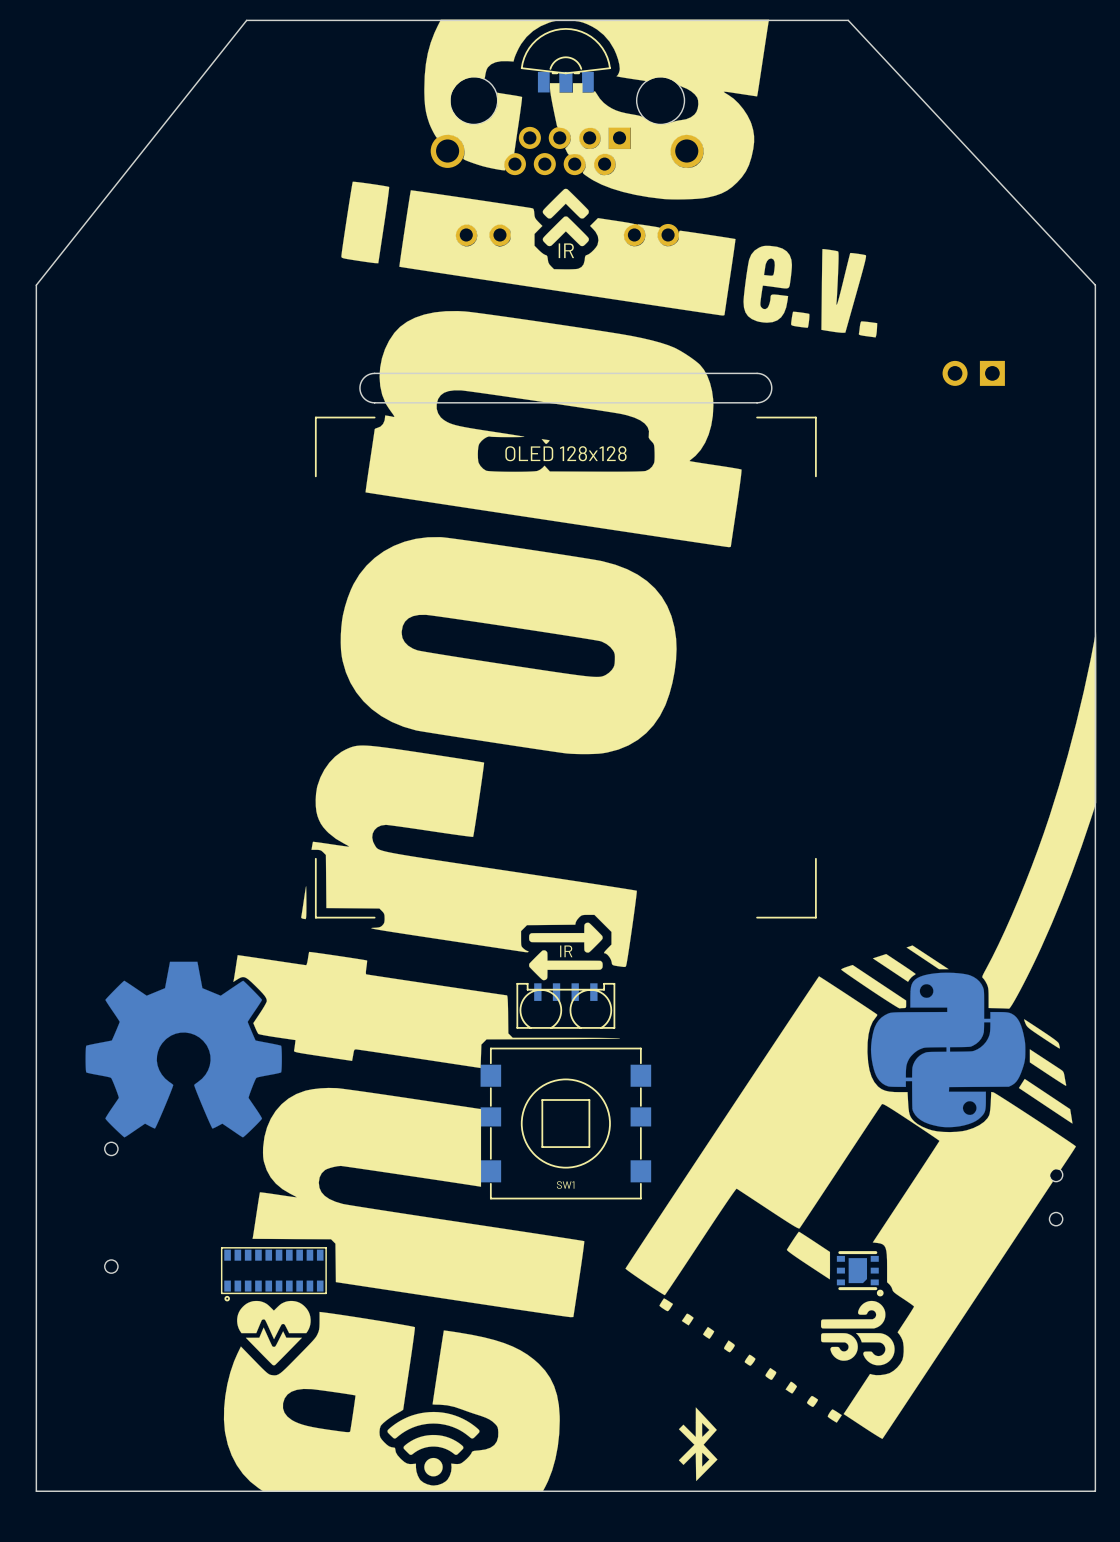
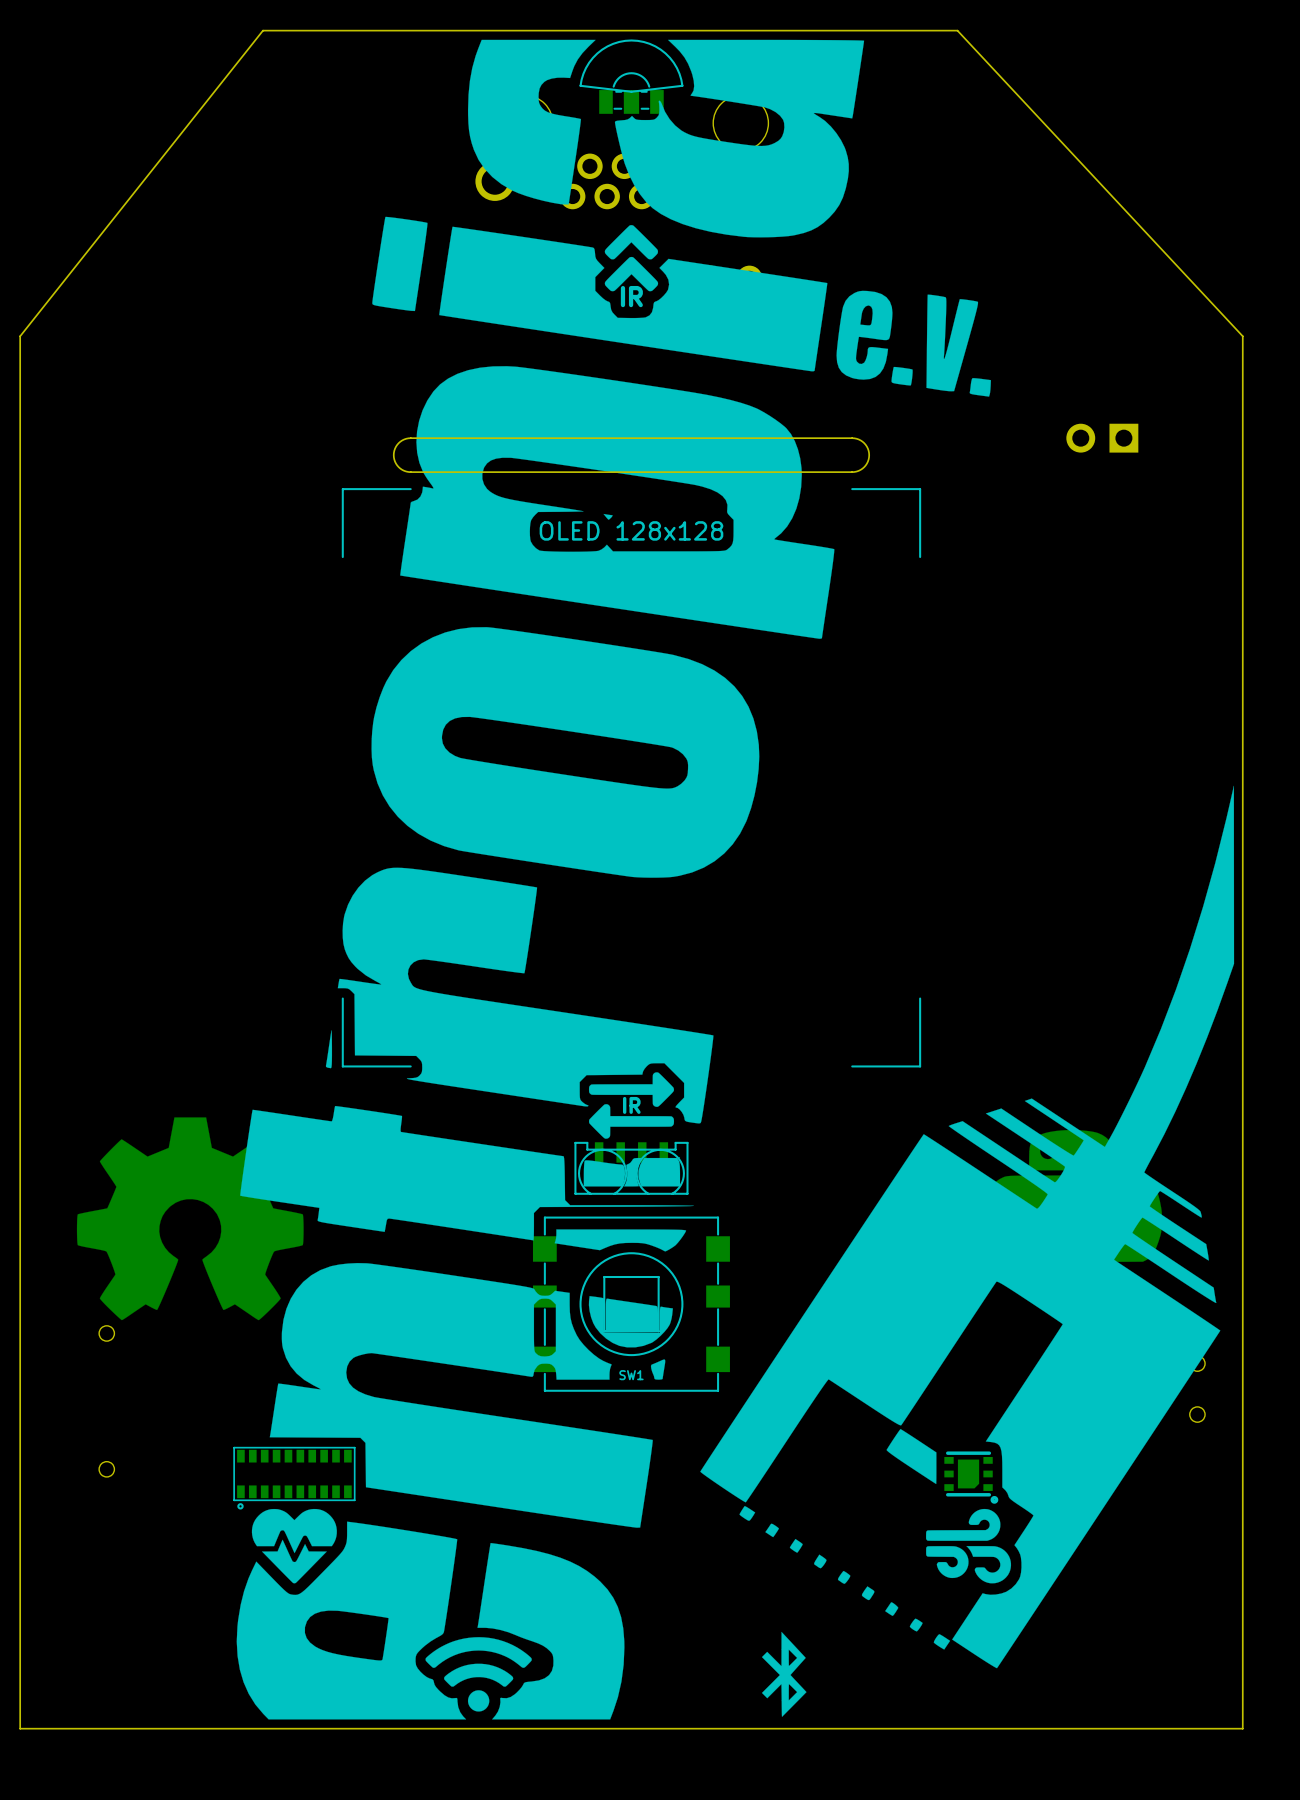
drawing shape: [223, 19, 1097, 1492] -> [236, 39, 1235, 1720]

